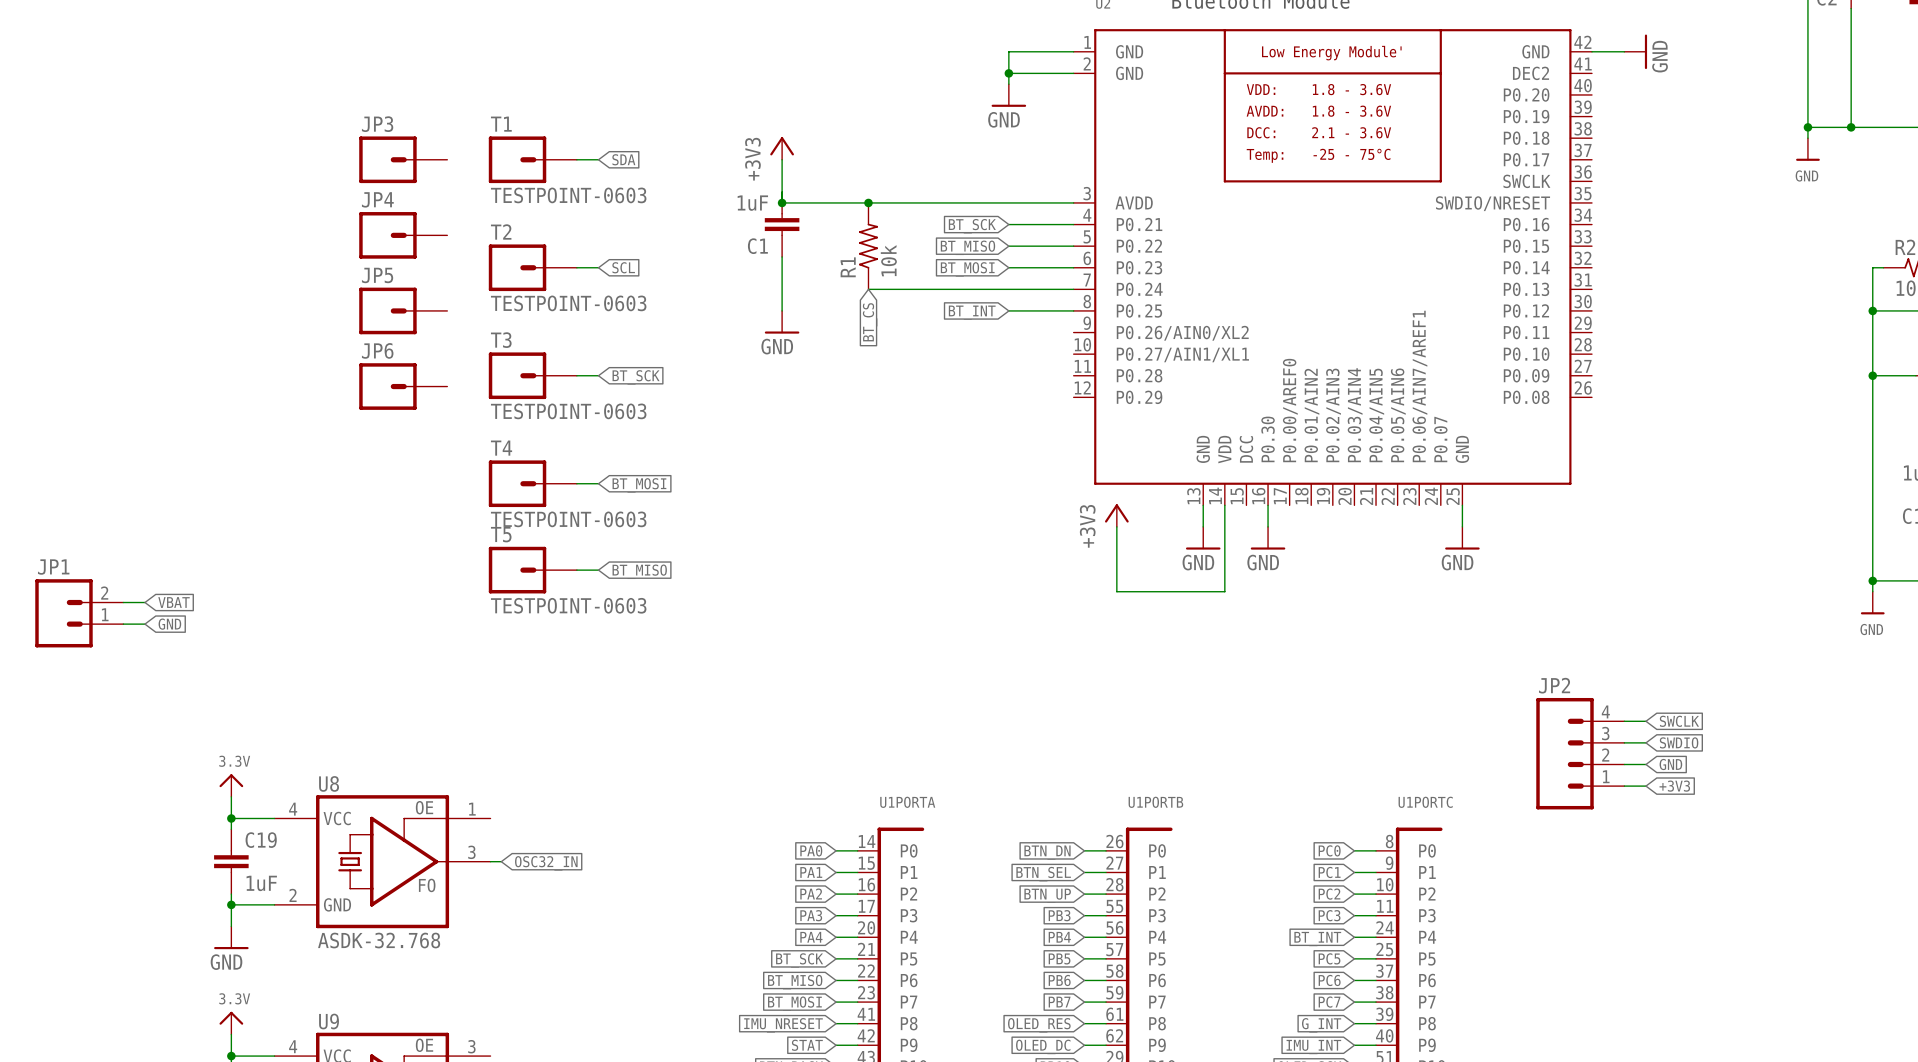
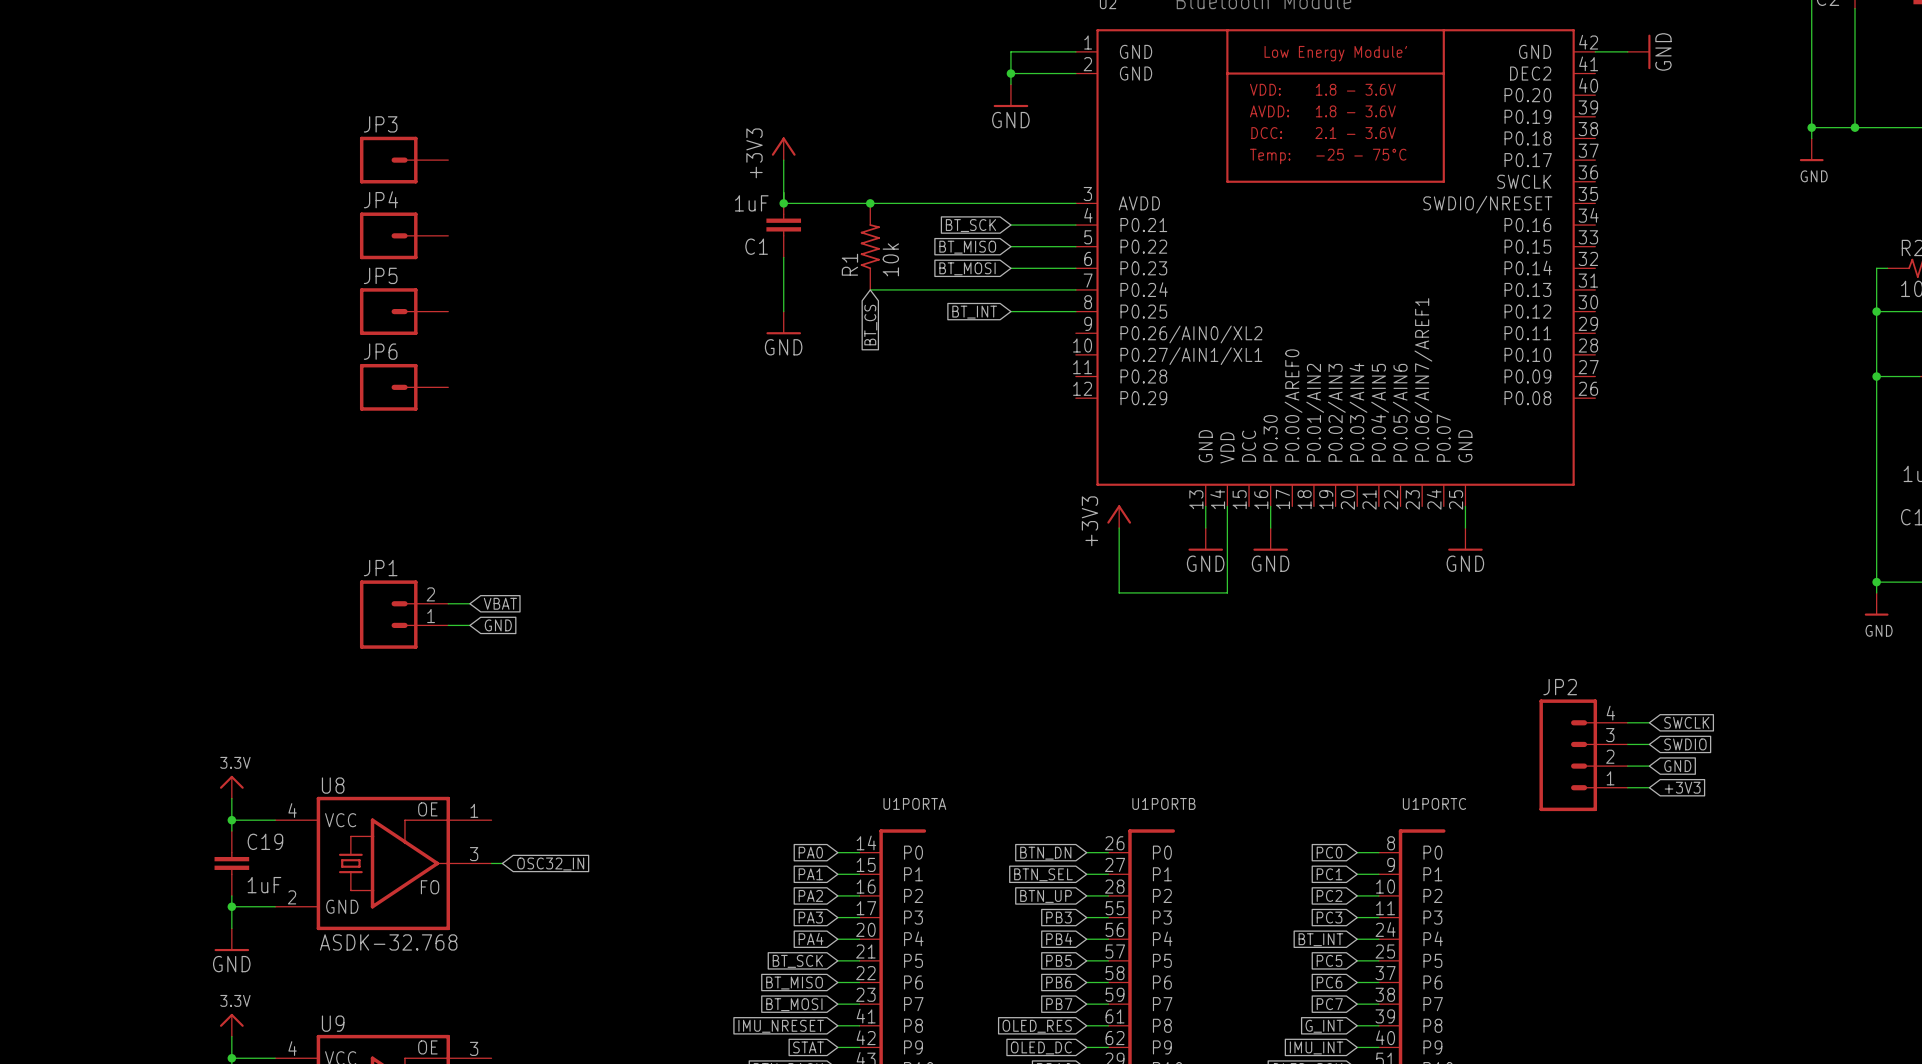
T1: TESTPOINT-0603 (532, 159) -> none
wire: (576, 159) (598, 159) -> none
global label: SDA (623, 159) -> none
T2: TESTPOINT-0603 (532, 267) -> none
wire: (576, 267) (598, 267) -> none
global label: SCL (623, 267) -> none
T3: TESTPOINT-0603 (532, 375) -> none
wire: (576, 375) (598, 375) -> none
global label: BT_SCK (636, 377) -> none
T4: TESTPOINT-0603 (532, 483) -> none
wire: (576, 483) (598, 483) -> (448, 625) (469, 625)
global label: BT_MOSI (639, 485) -> none
T5: TESTPOINT-0603 (532, 570) -> none
wire: (576, 570) (598, 570) -> (448, 603) (469, 603)
global label: BT_MISO (639, 571) -> none
wire: (123, 602) (144, 602) -> none
global label: VBAT (174, 602) -> none
global label: none -> VBAT (500, 603)
JP1 position: (79, 613) -> (404, 614)
wire: (123, 624) (144, 624) -> none
global label: GND (169, 624) -> none
global label: none -> GND (498, 625)

